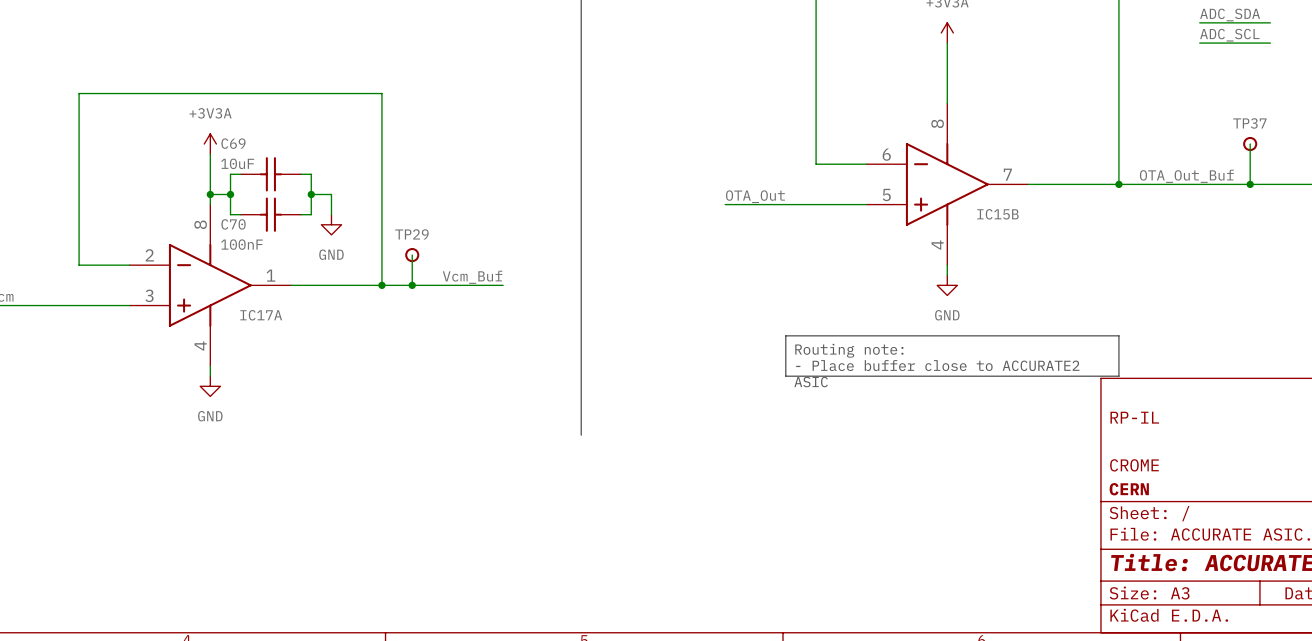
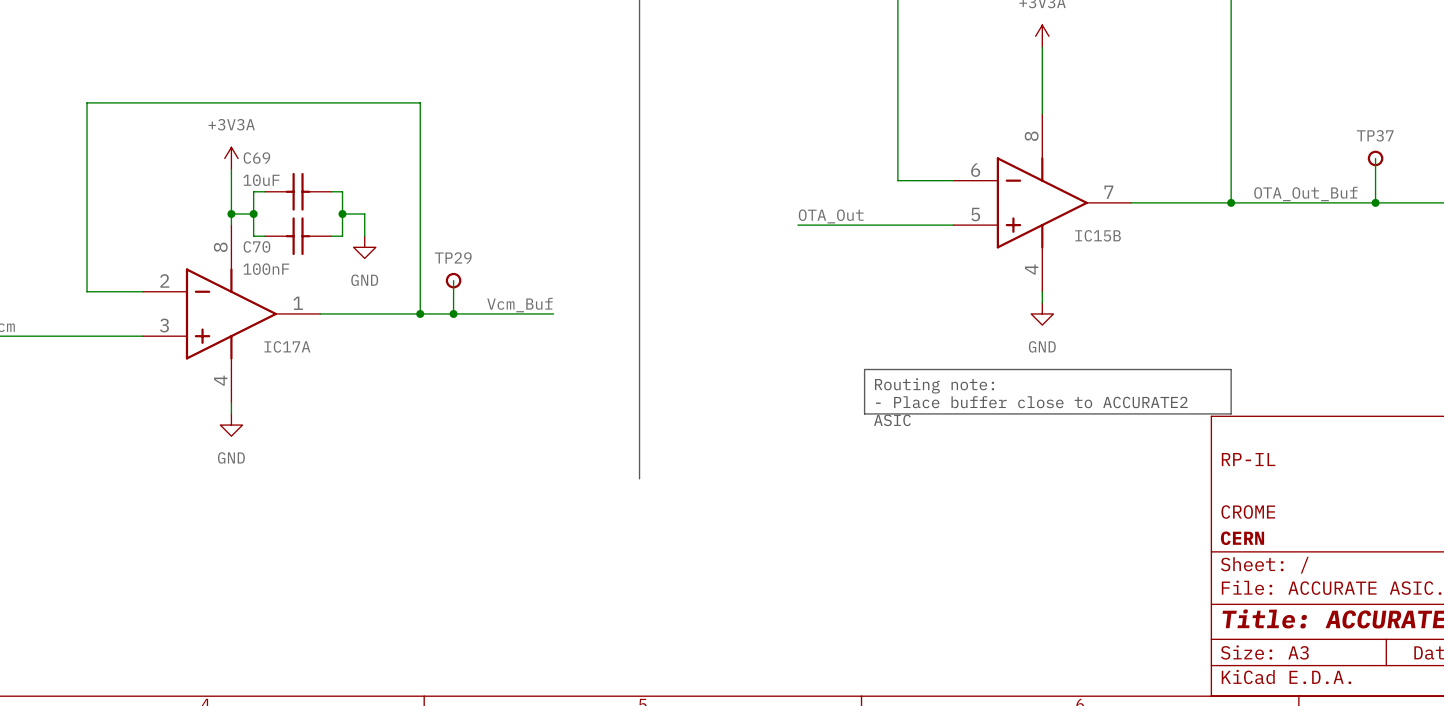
label: ADC_SDA (1230, 14) -> none
wire: (1199, 22) (1270, 22) -> none
label: ADC_SCL (1229, 35) -> none
wire: (1199, 43) (1270, 43) -> none

